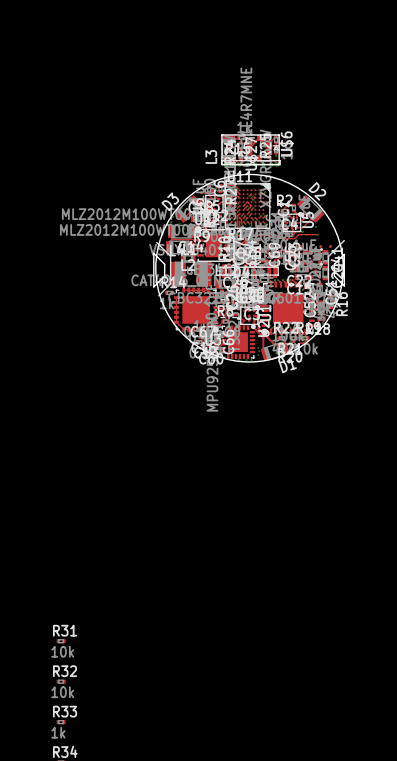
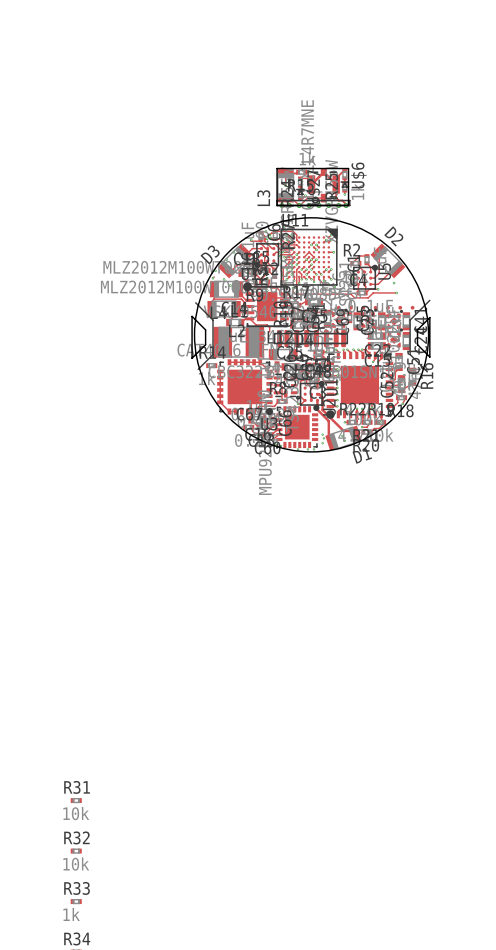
track: none -> (241, 322) (245, 318) (249, 318) (256, 324) (267, 324) (269, 327) (269, 331)

